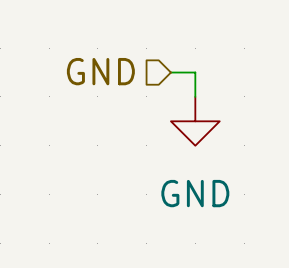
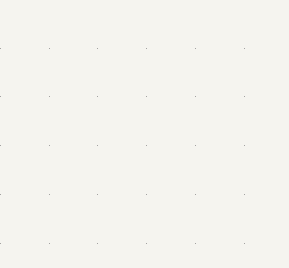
hierarchical label: GND (100, 71) -> none
wire: (170, 72) (195, 72) (195, 96) -> none
power symbol: GND (195, 121) -> none

